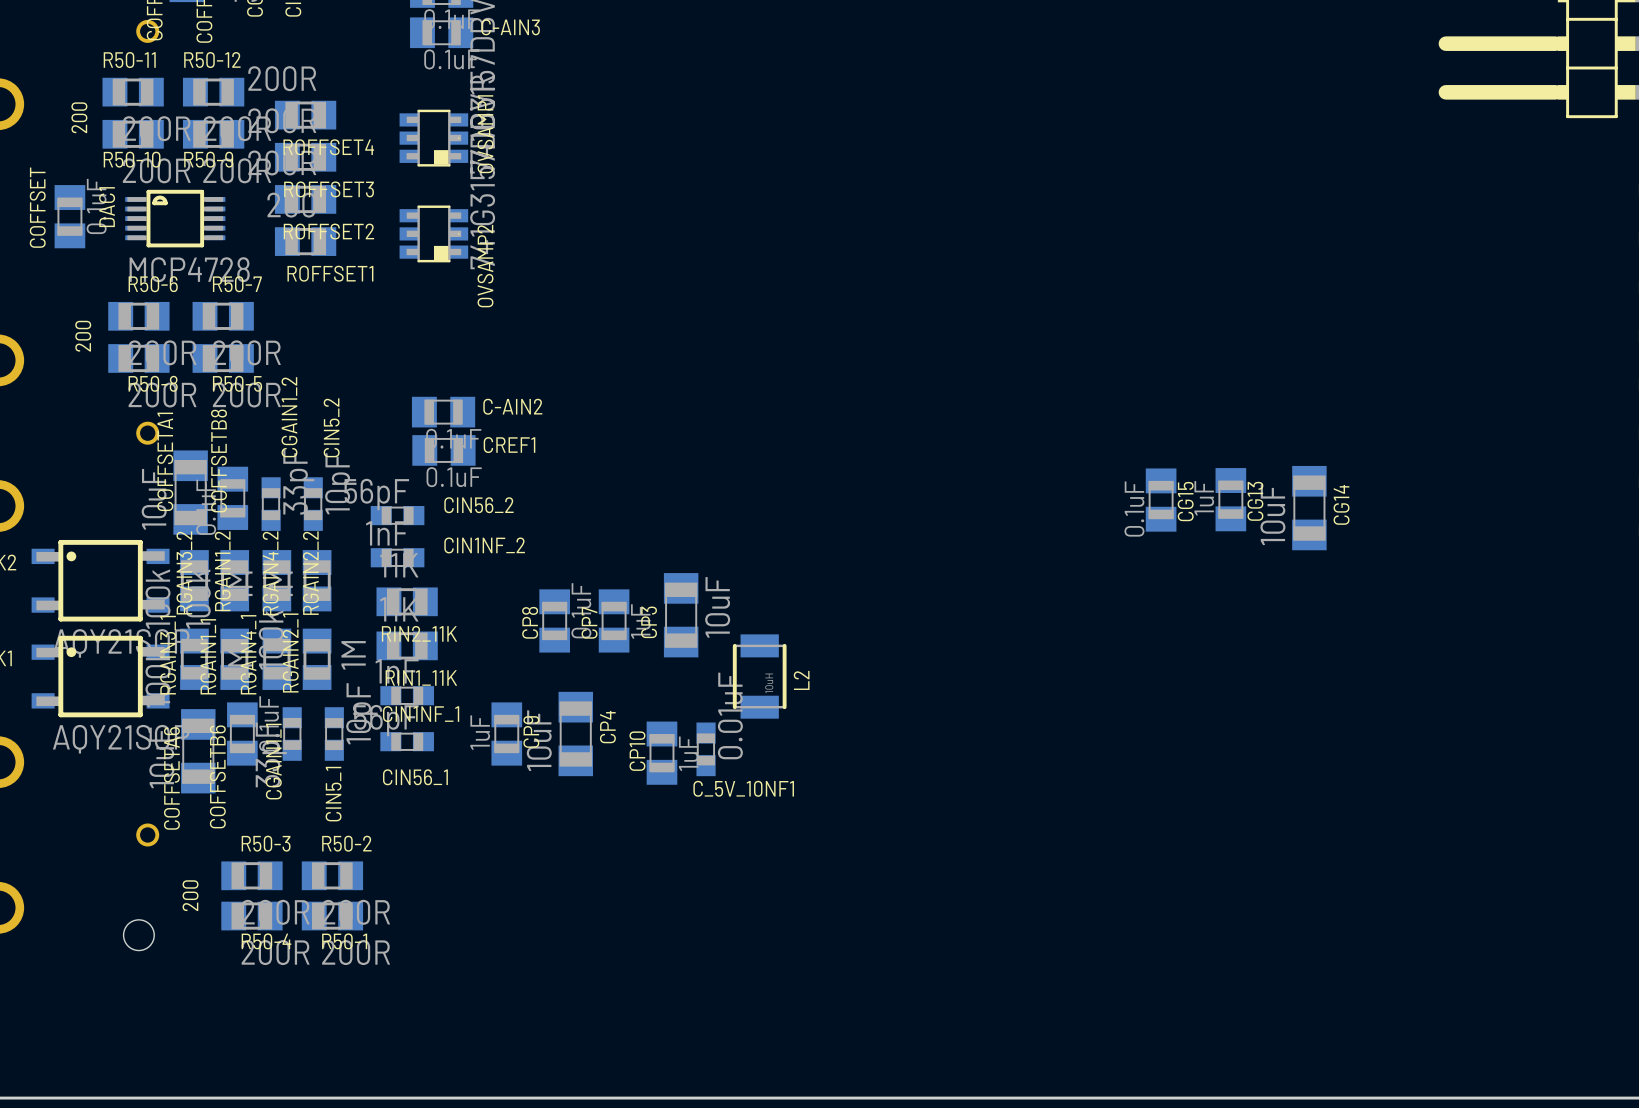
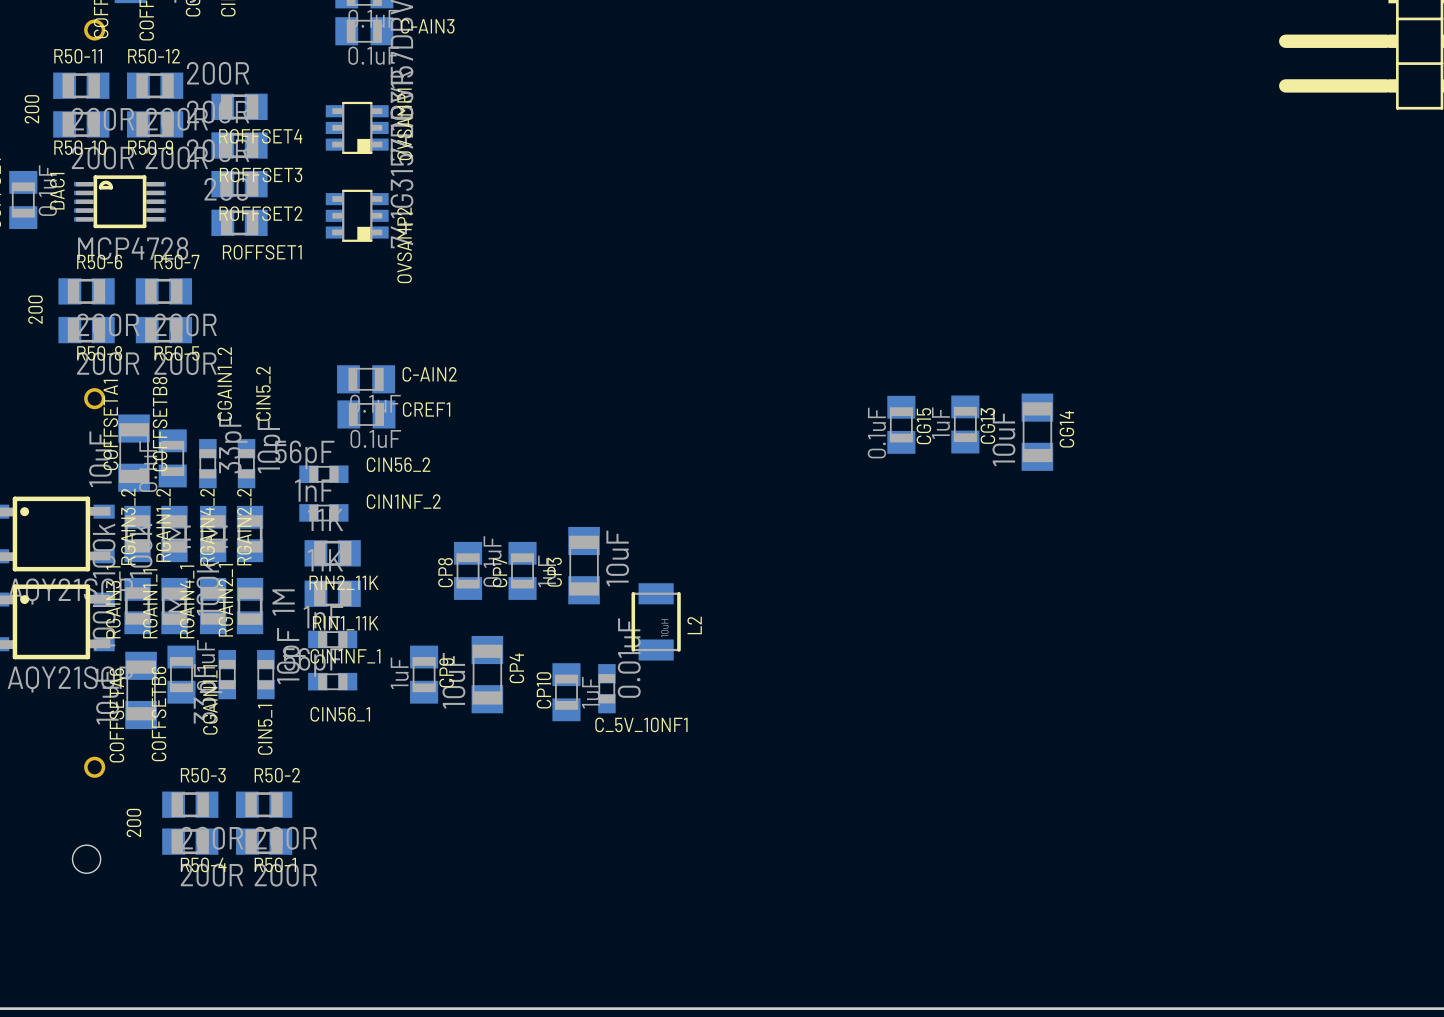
CG13 position: (1230, 499) -> (965, 424)
CG15 position: (1161, 500) -> (901, 424)
CG14 position: (1309, 508) -> (1037, 432)

